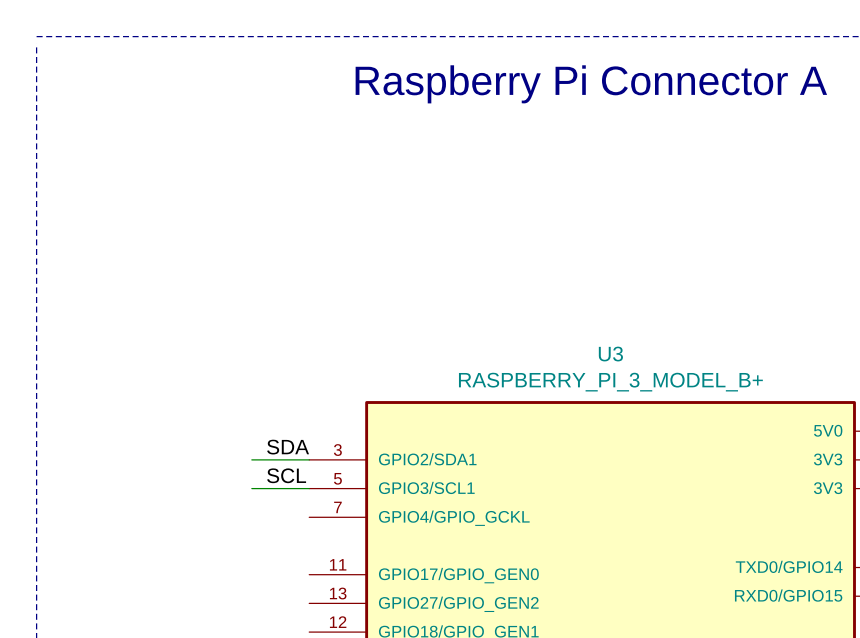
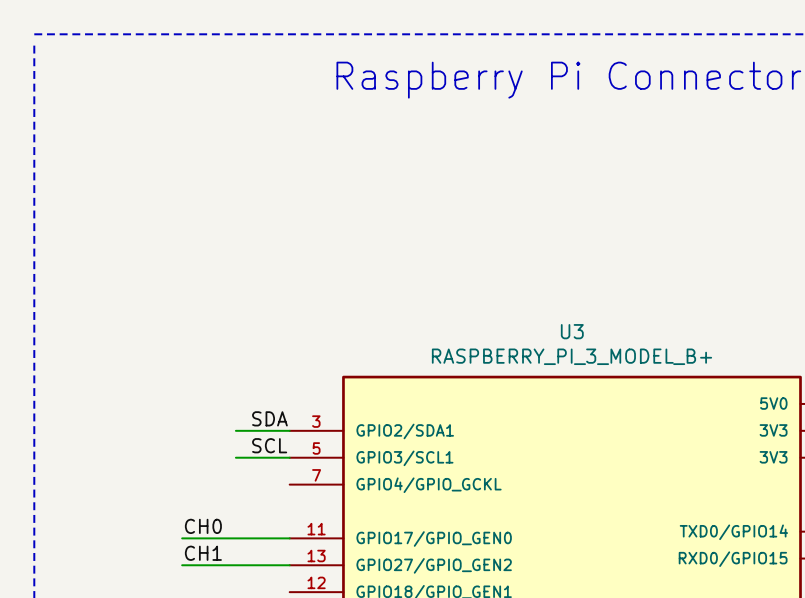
label: none -> CH0 (203, 526)
wire: none -> (182, 538) (289, 538)
label: none -> CH1 (203, 553)
wire: none -> (182, 565) (289, 565)

